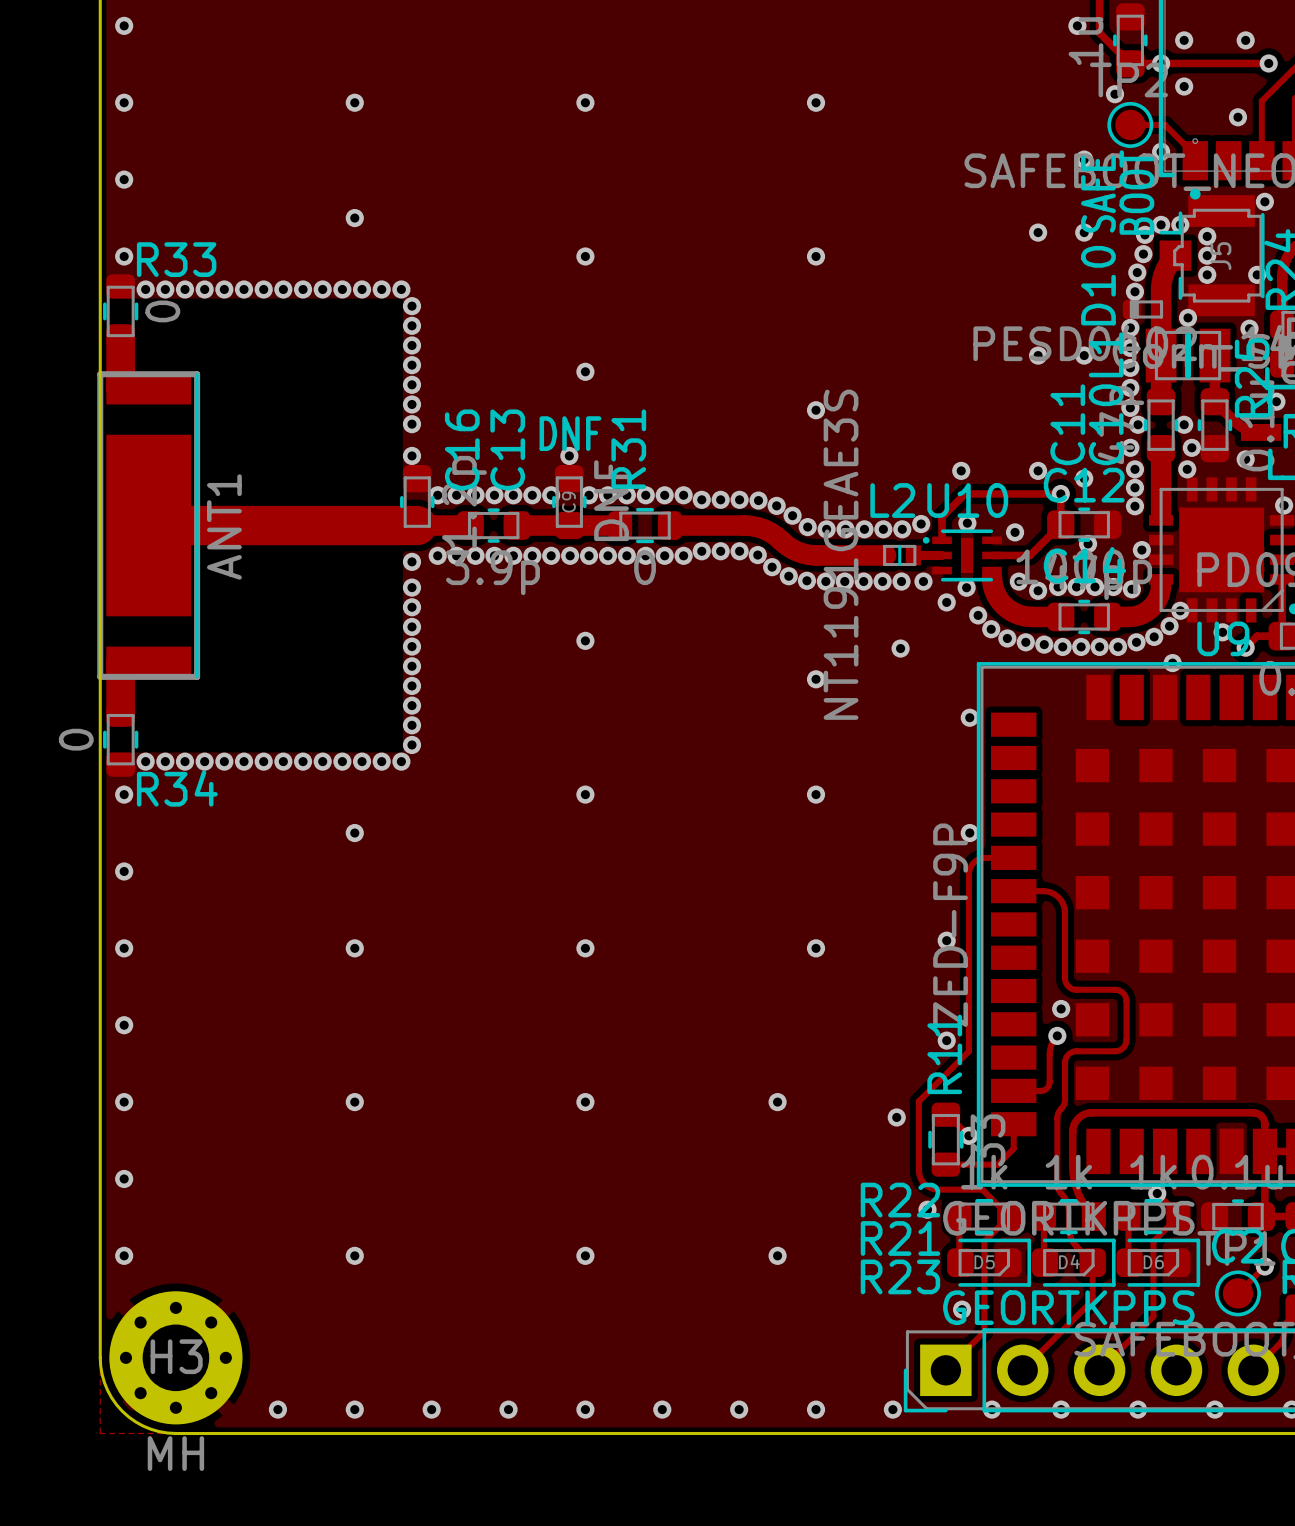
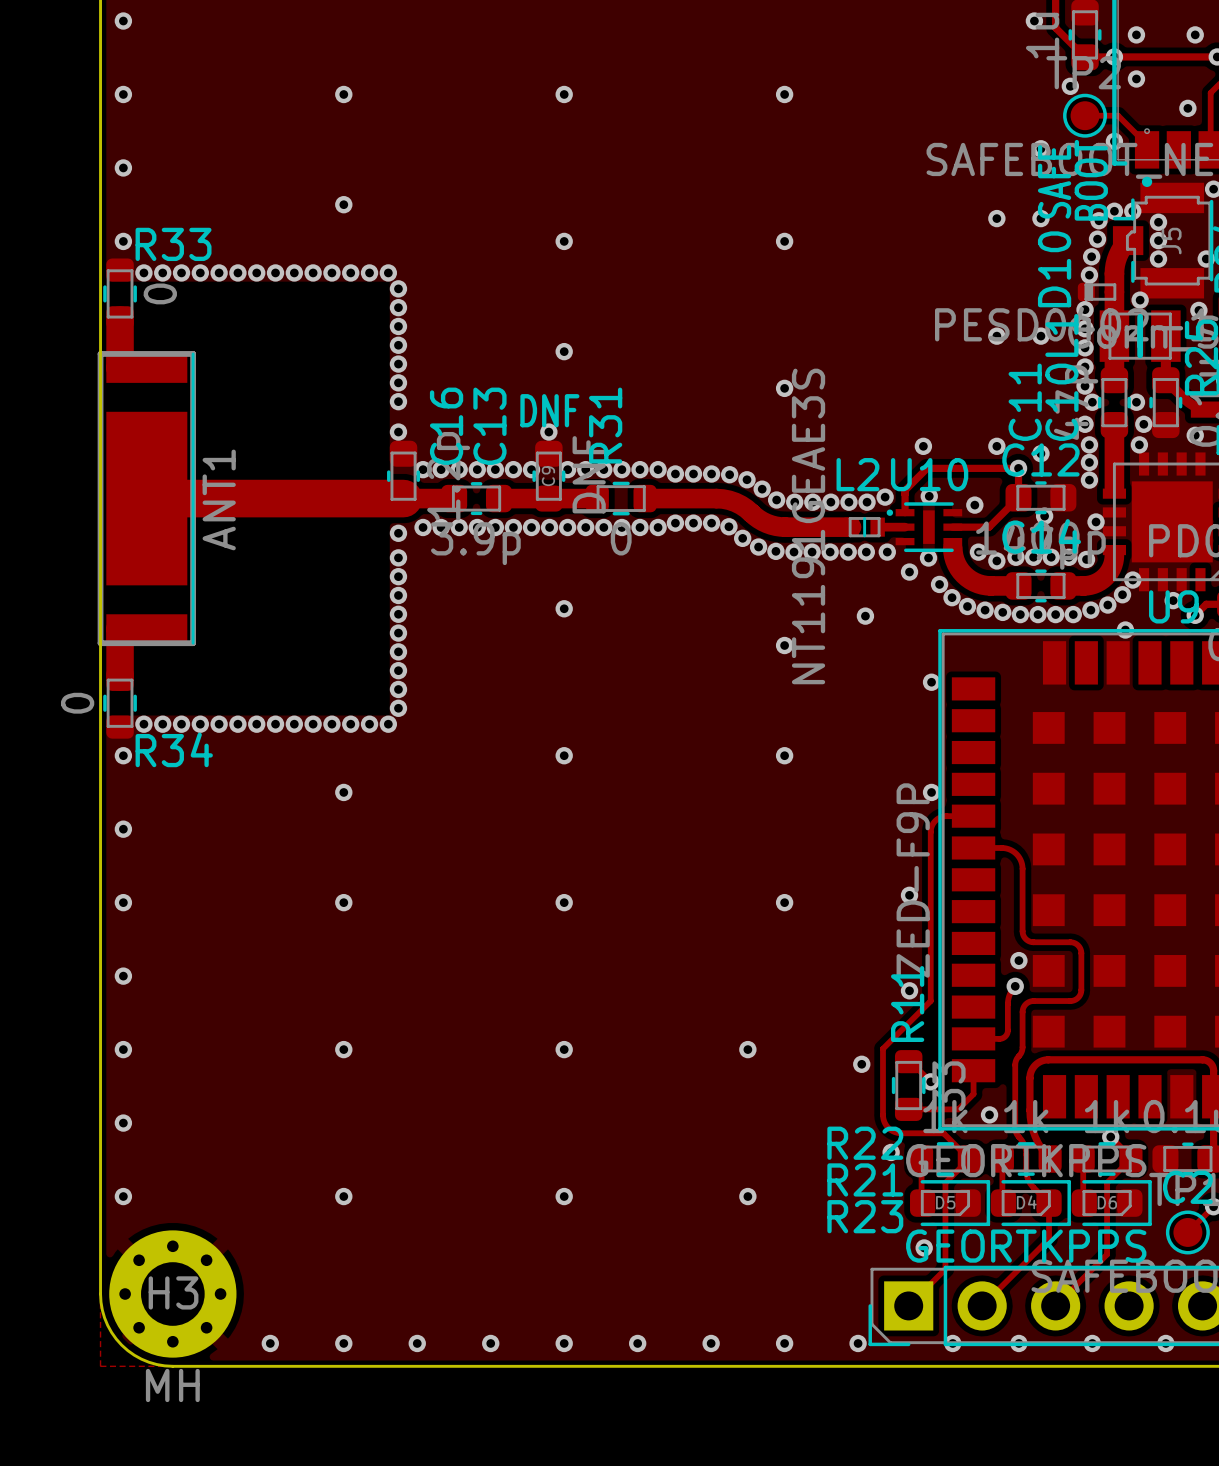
via: none -> (989, 1114)

